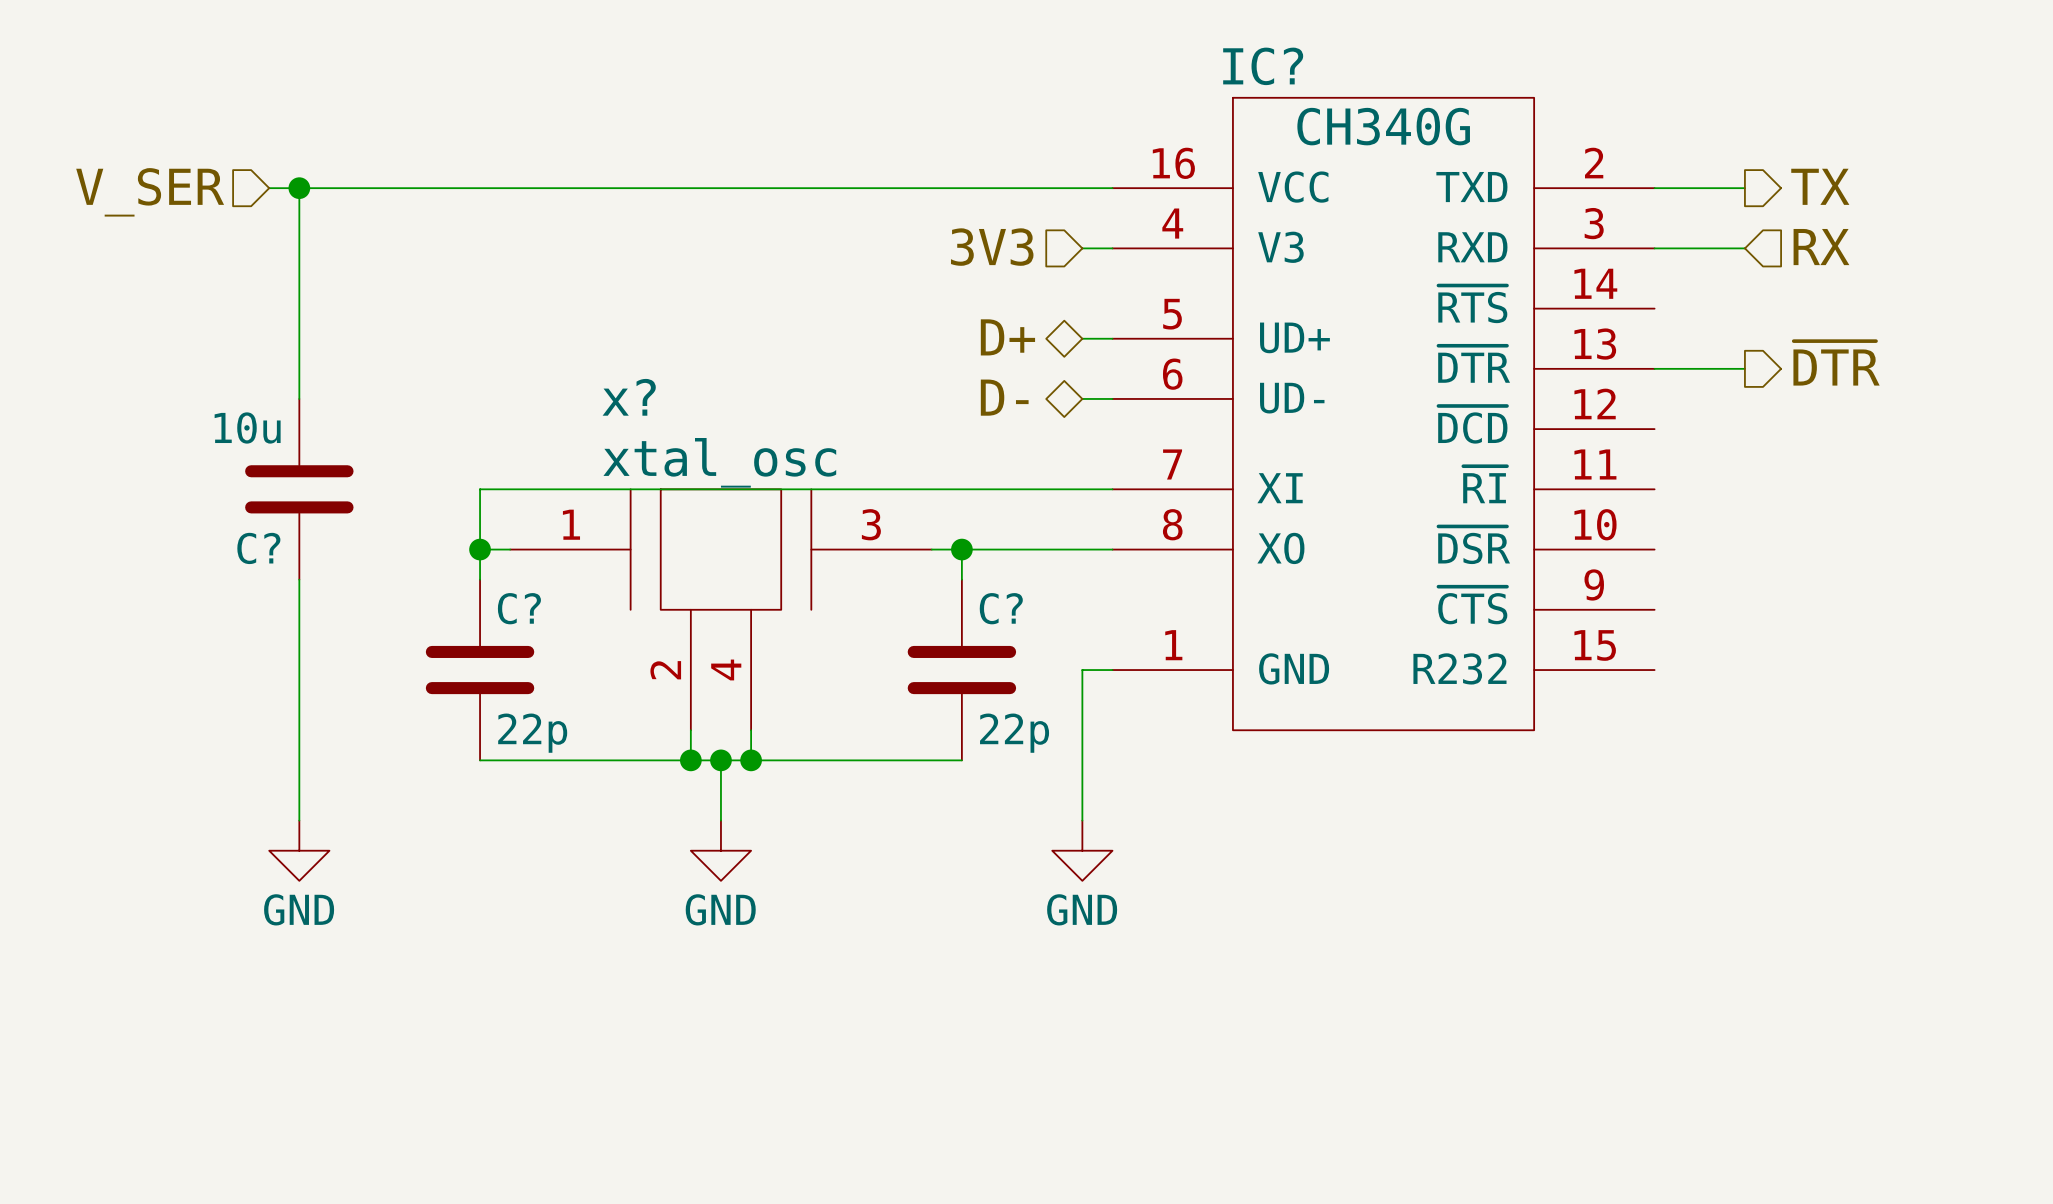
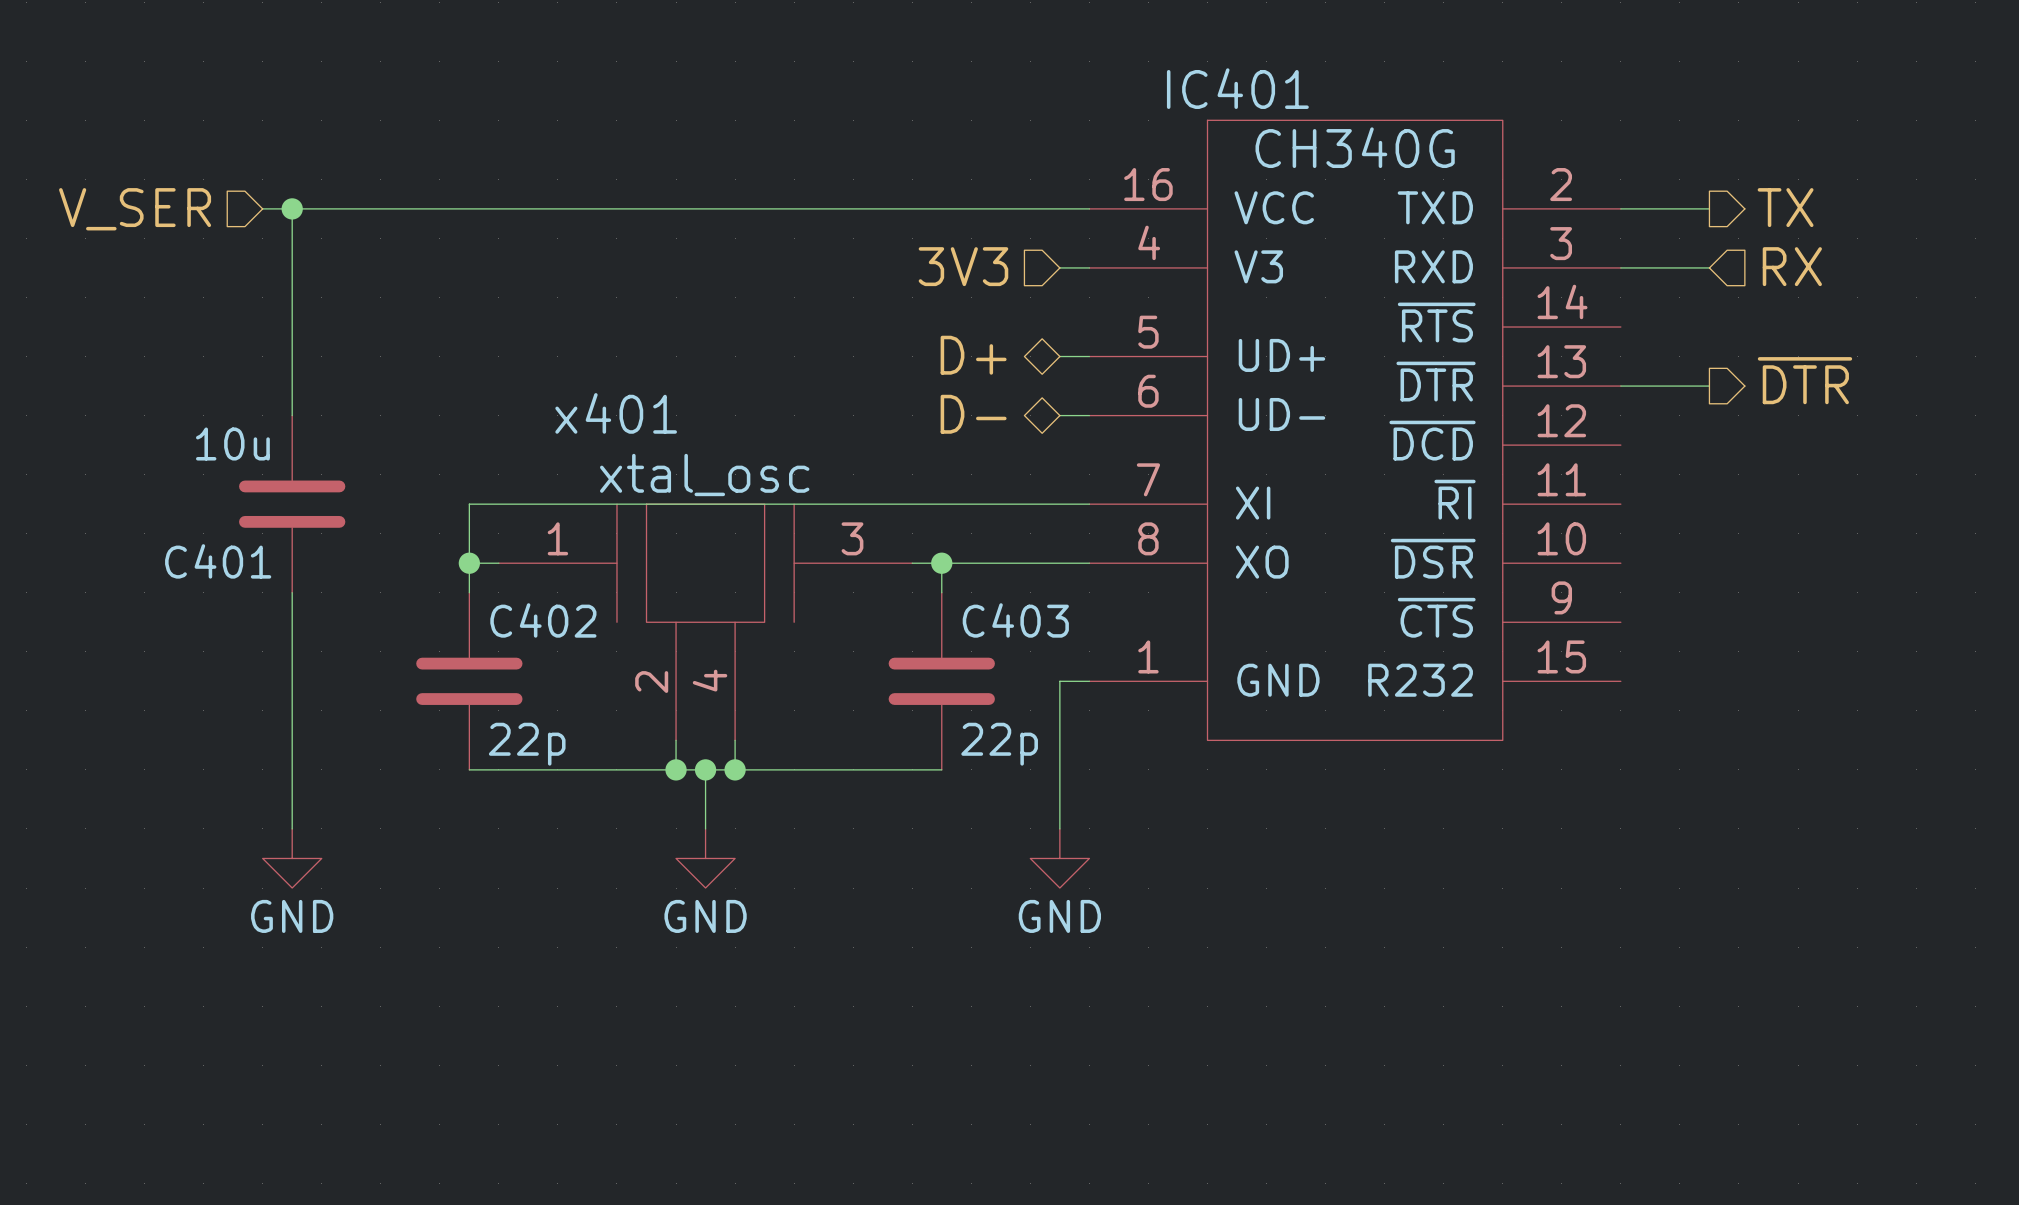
IC? name: IC? (1263, 66) -> IC401 (1237, 88)
x? name: x? (629, 397) -> x401 (616, 413)
C? name: C? (258, 548) -> C401 (218, 561)
C? name: C? (519, 608) -> C402 (543, 620)
C? name: C? (1001, 608) -> C403 (1015, 620)

